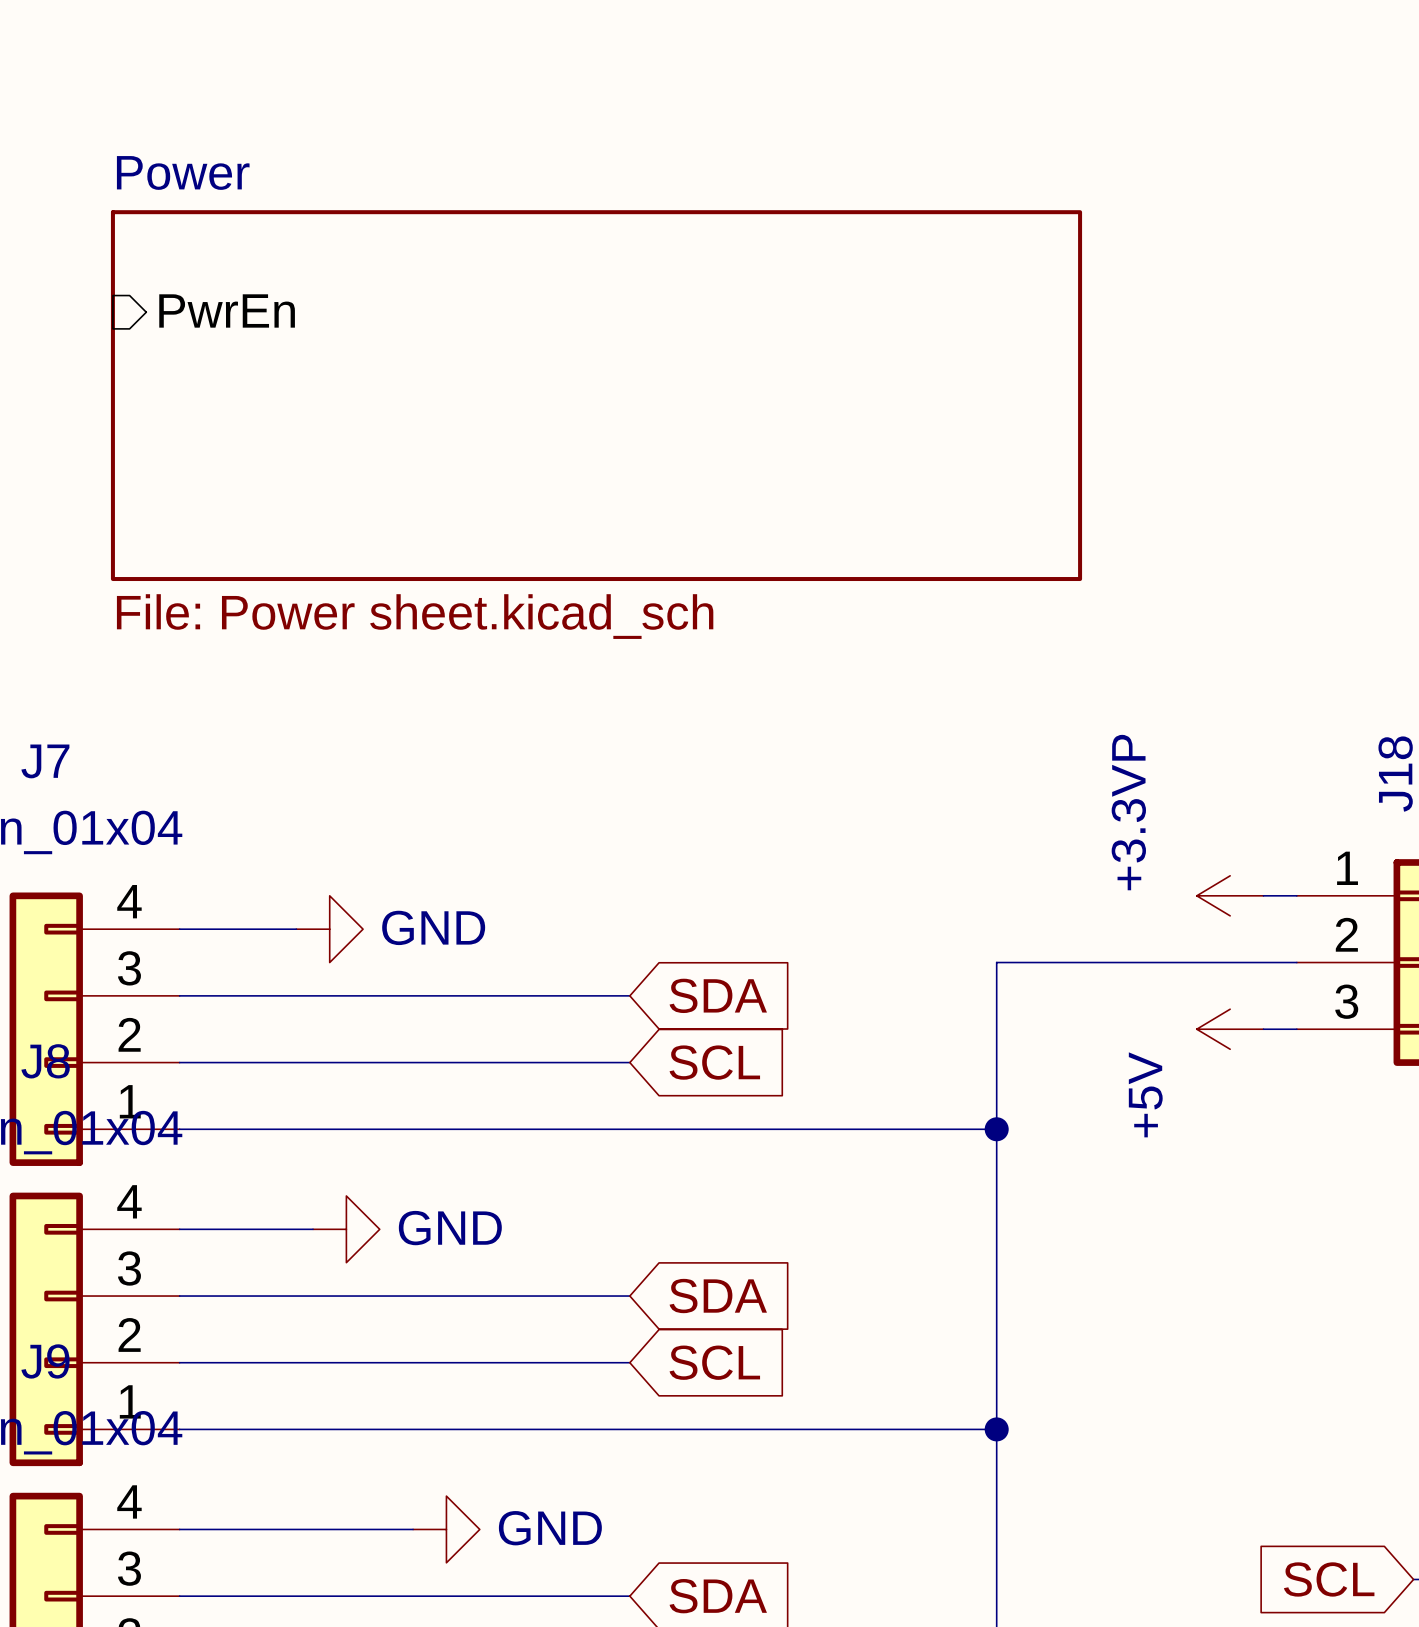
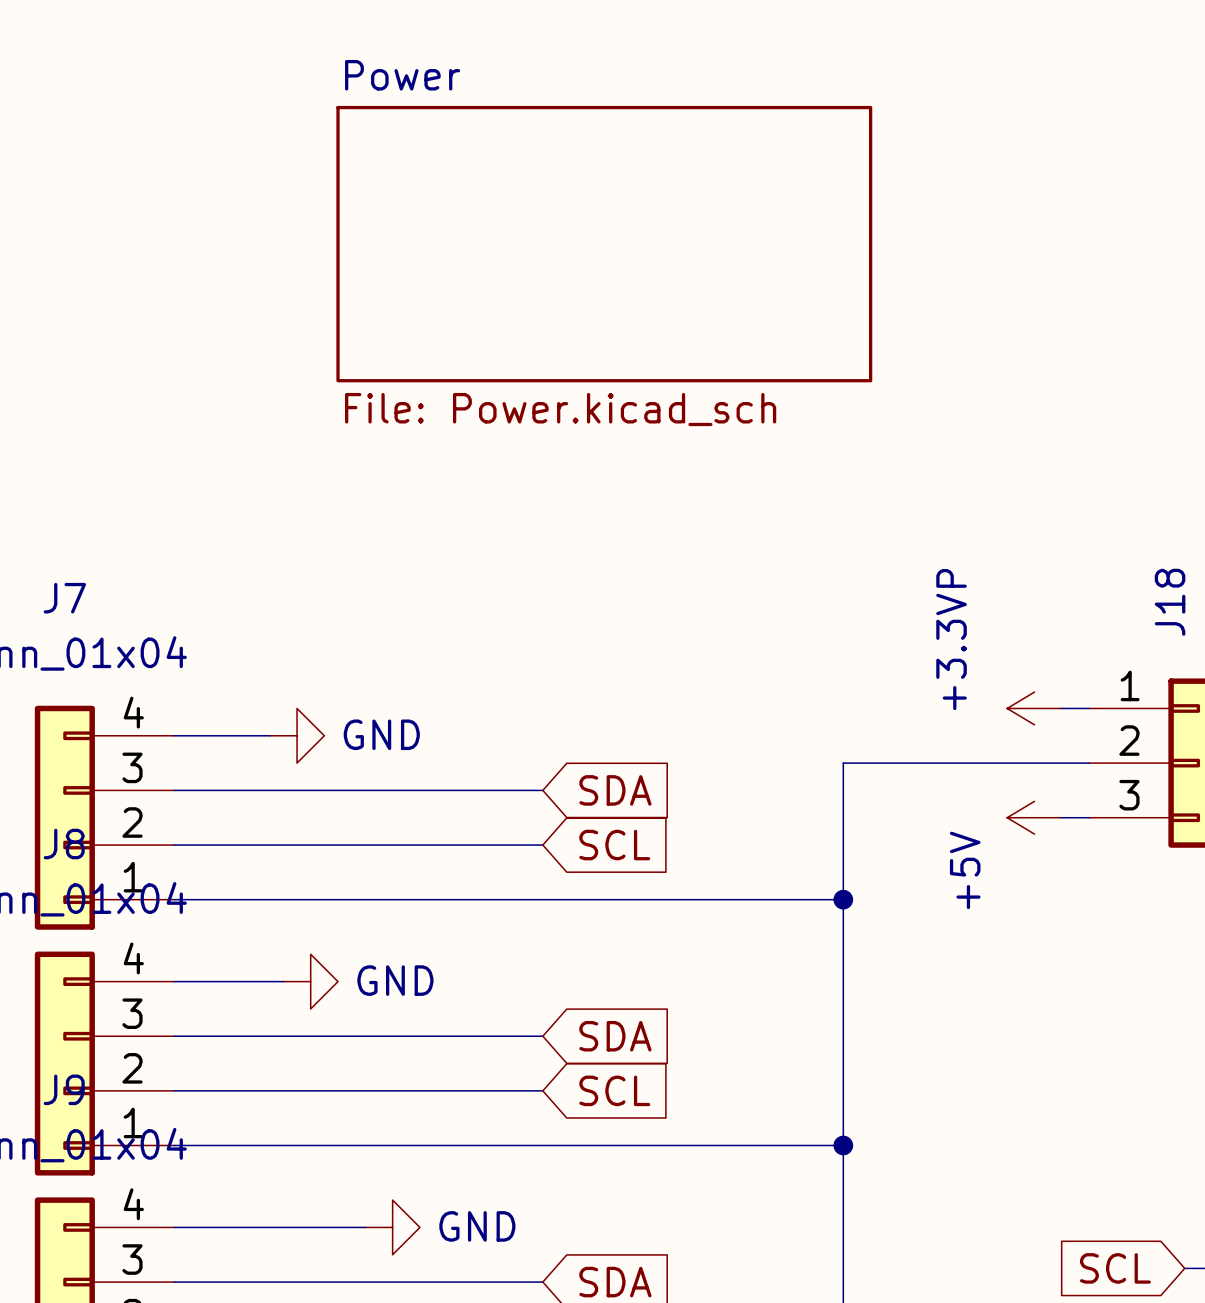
sheet pin: PwrEn (227, 310) -> none
sheet Power: none -> File: Power.kicad_sch (604, 244)
sheet Power: File: Power sheet.kicad_sch (596, 395) -> none

